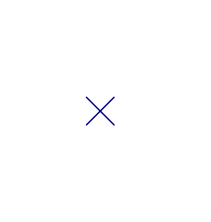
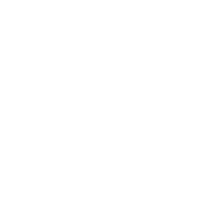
no-connect mark: (100, 111) -> none

